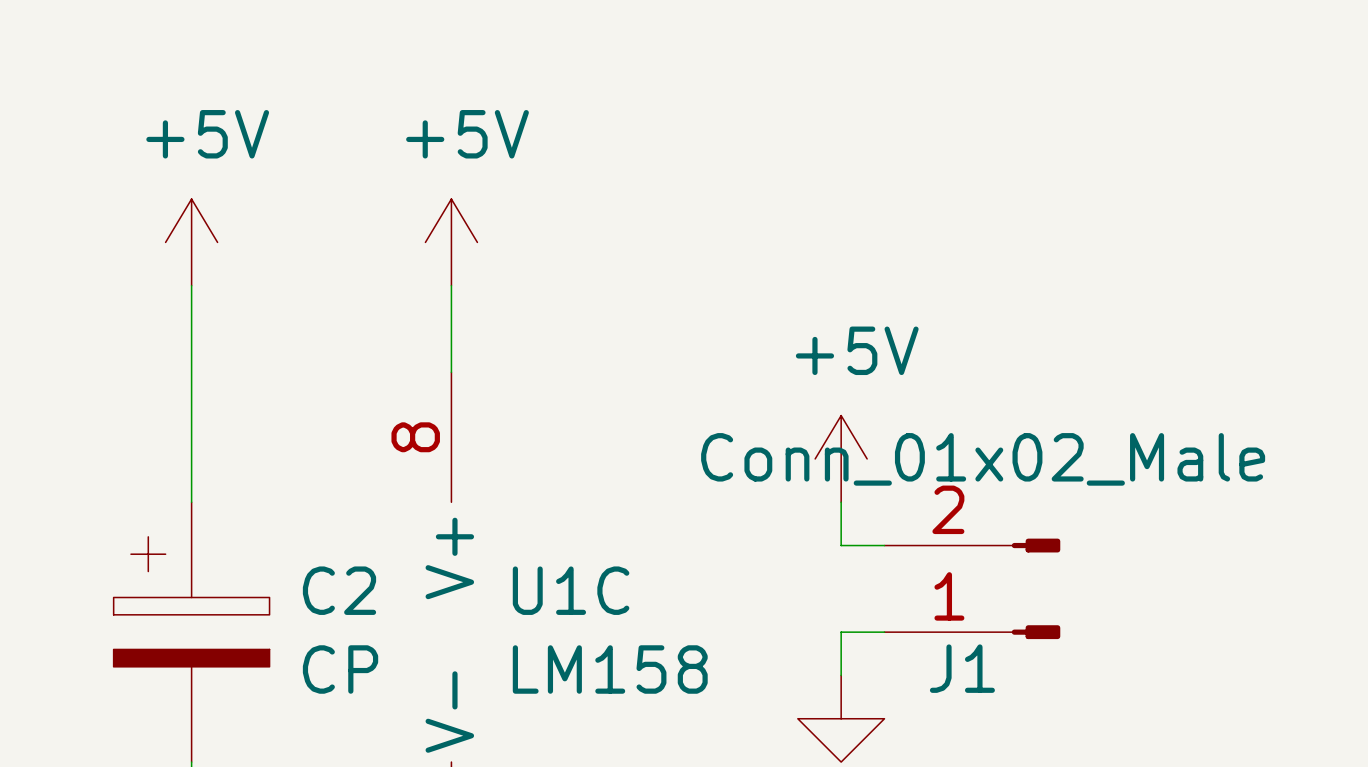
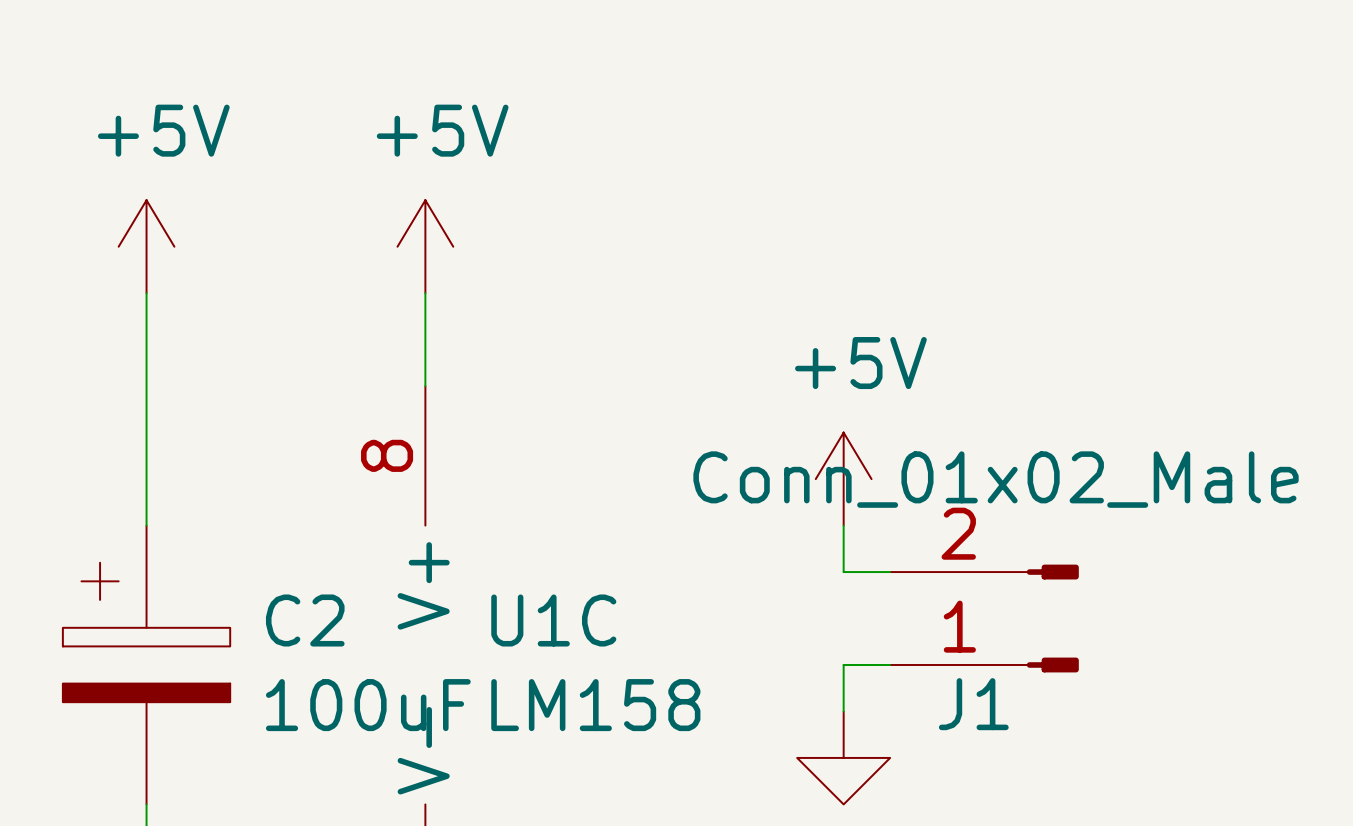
C2 value: CP (340, 669) -> 100uF (368, 705)

